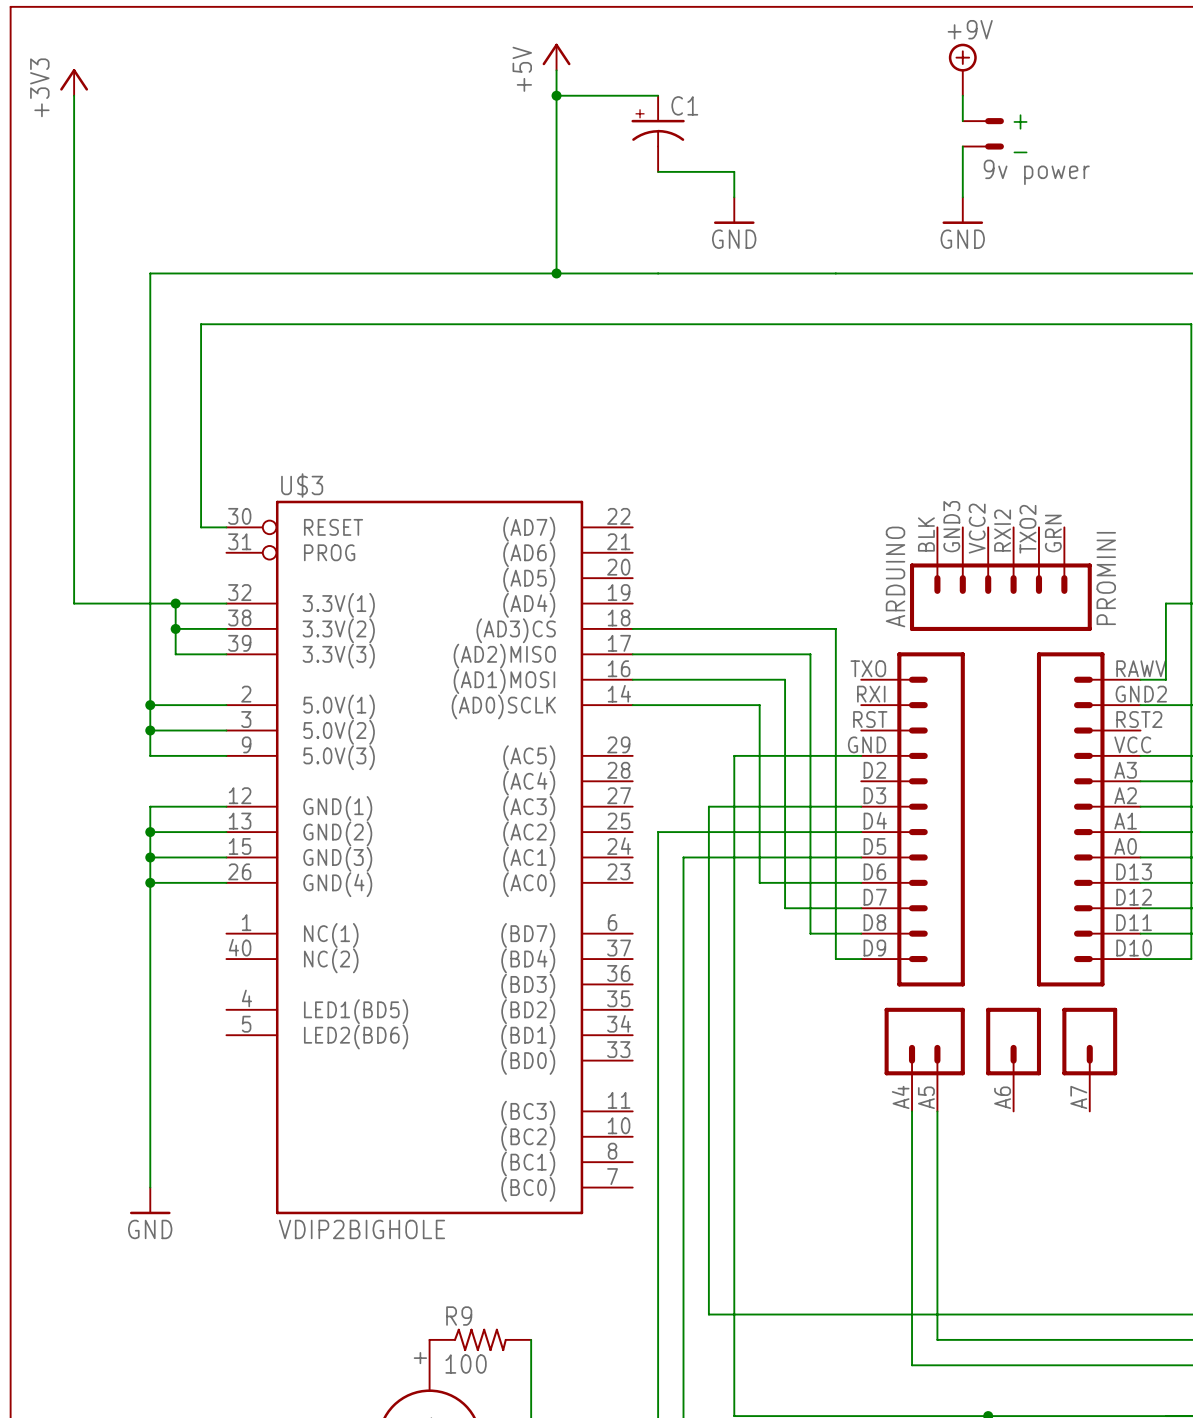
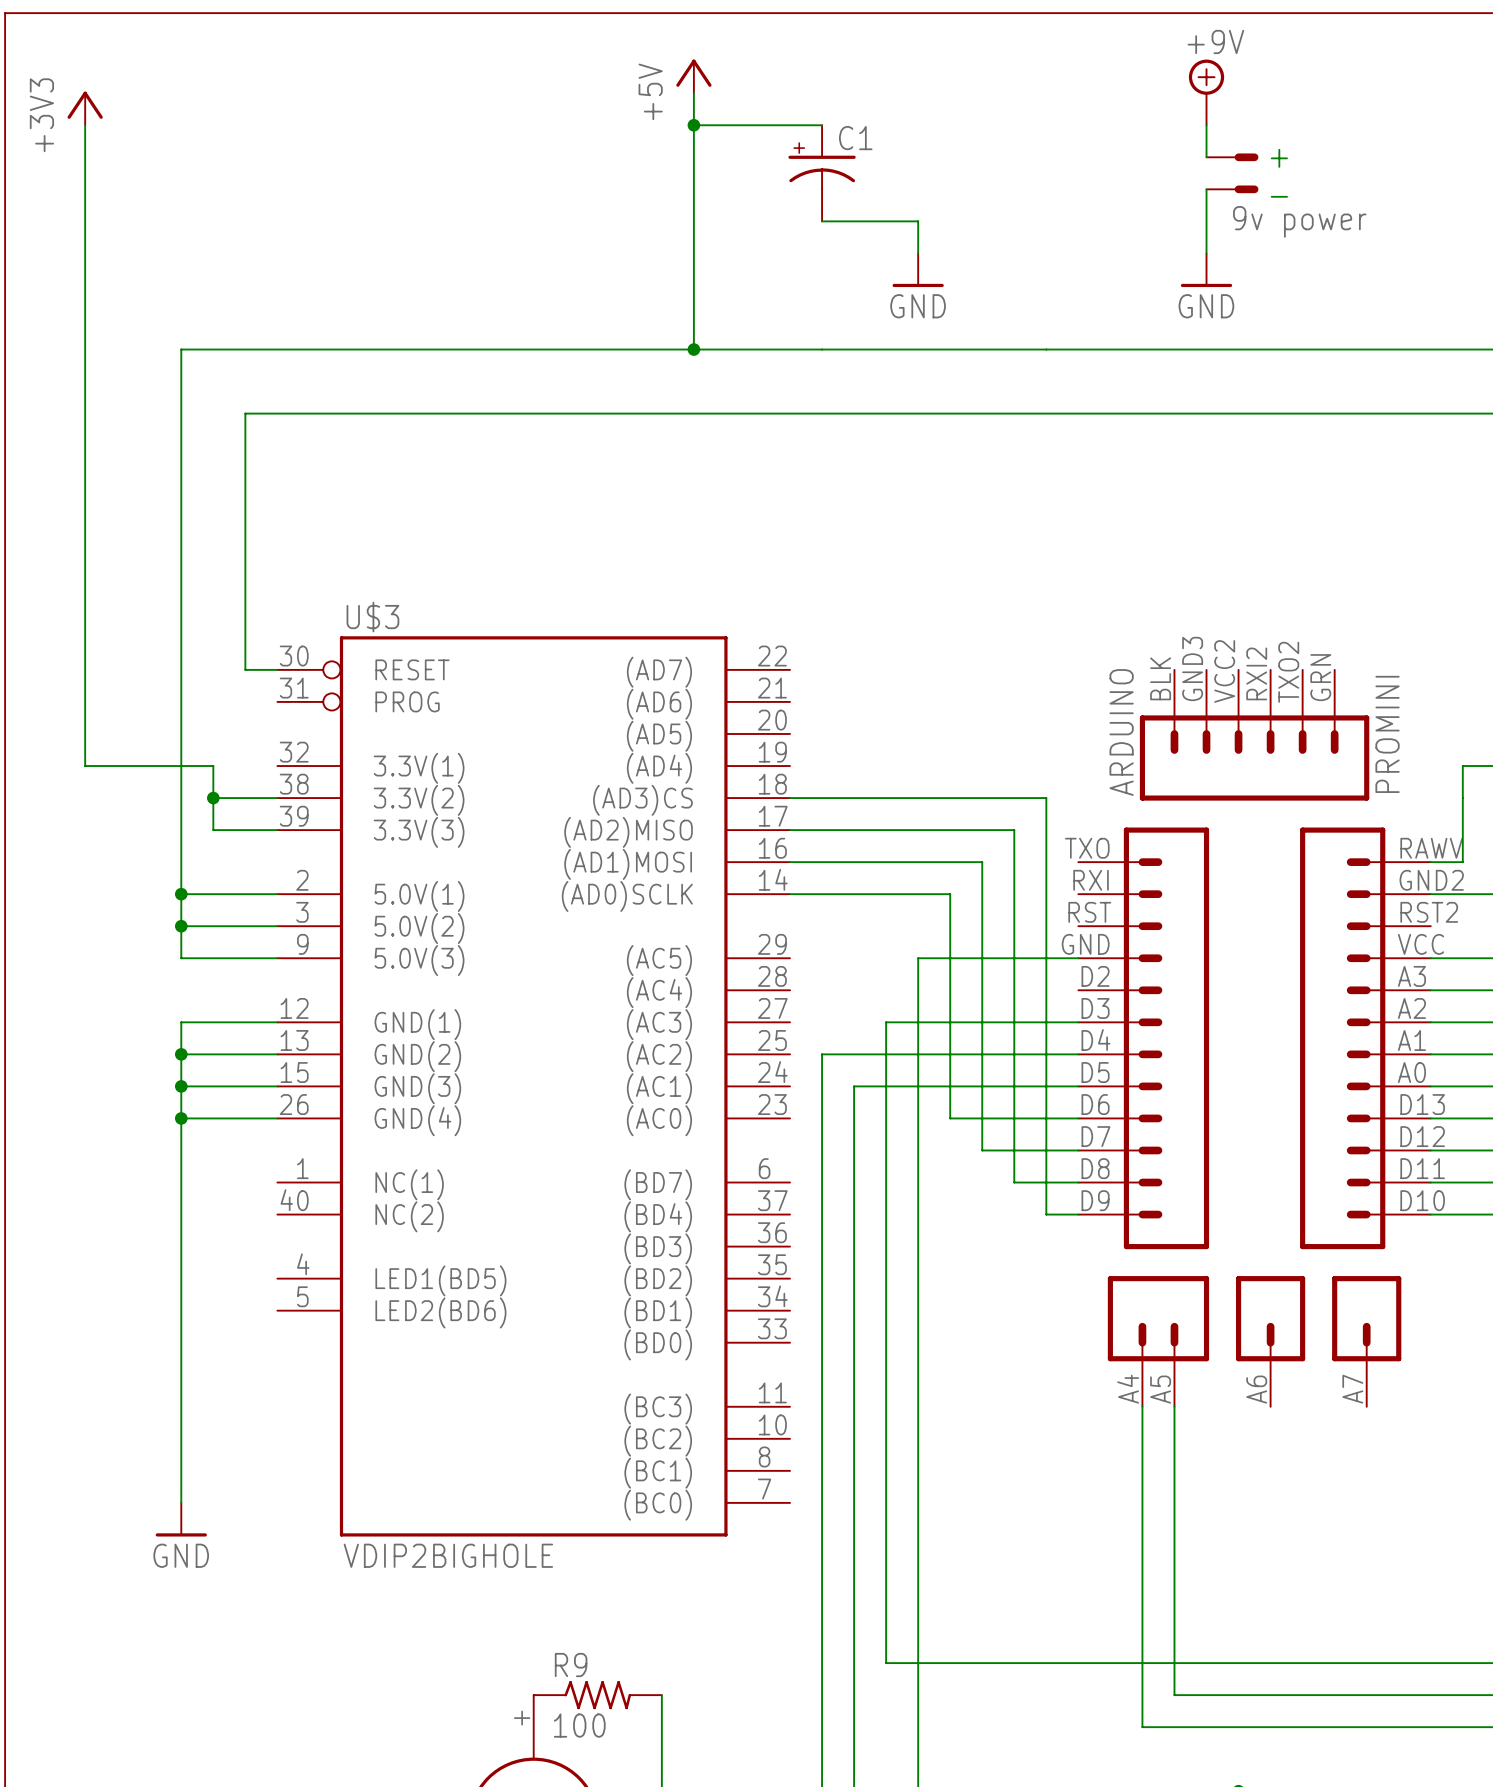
wire: (175, 603) (226, 603) -> none
junction: (175, 603) -> none

